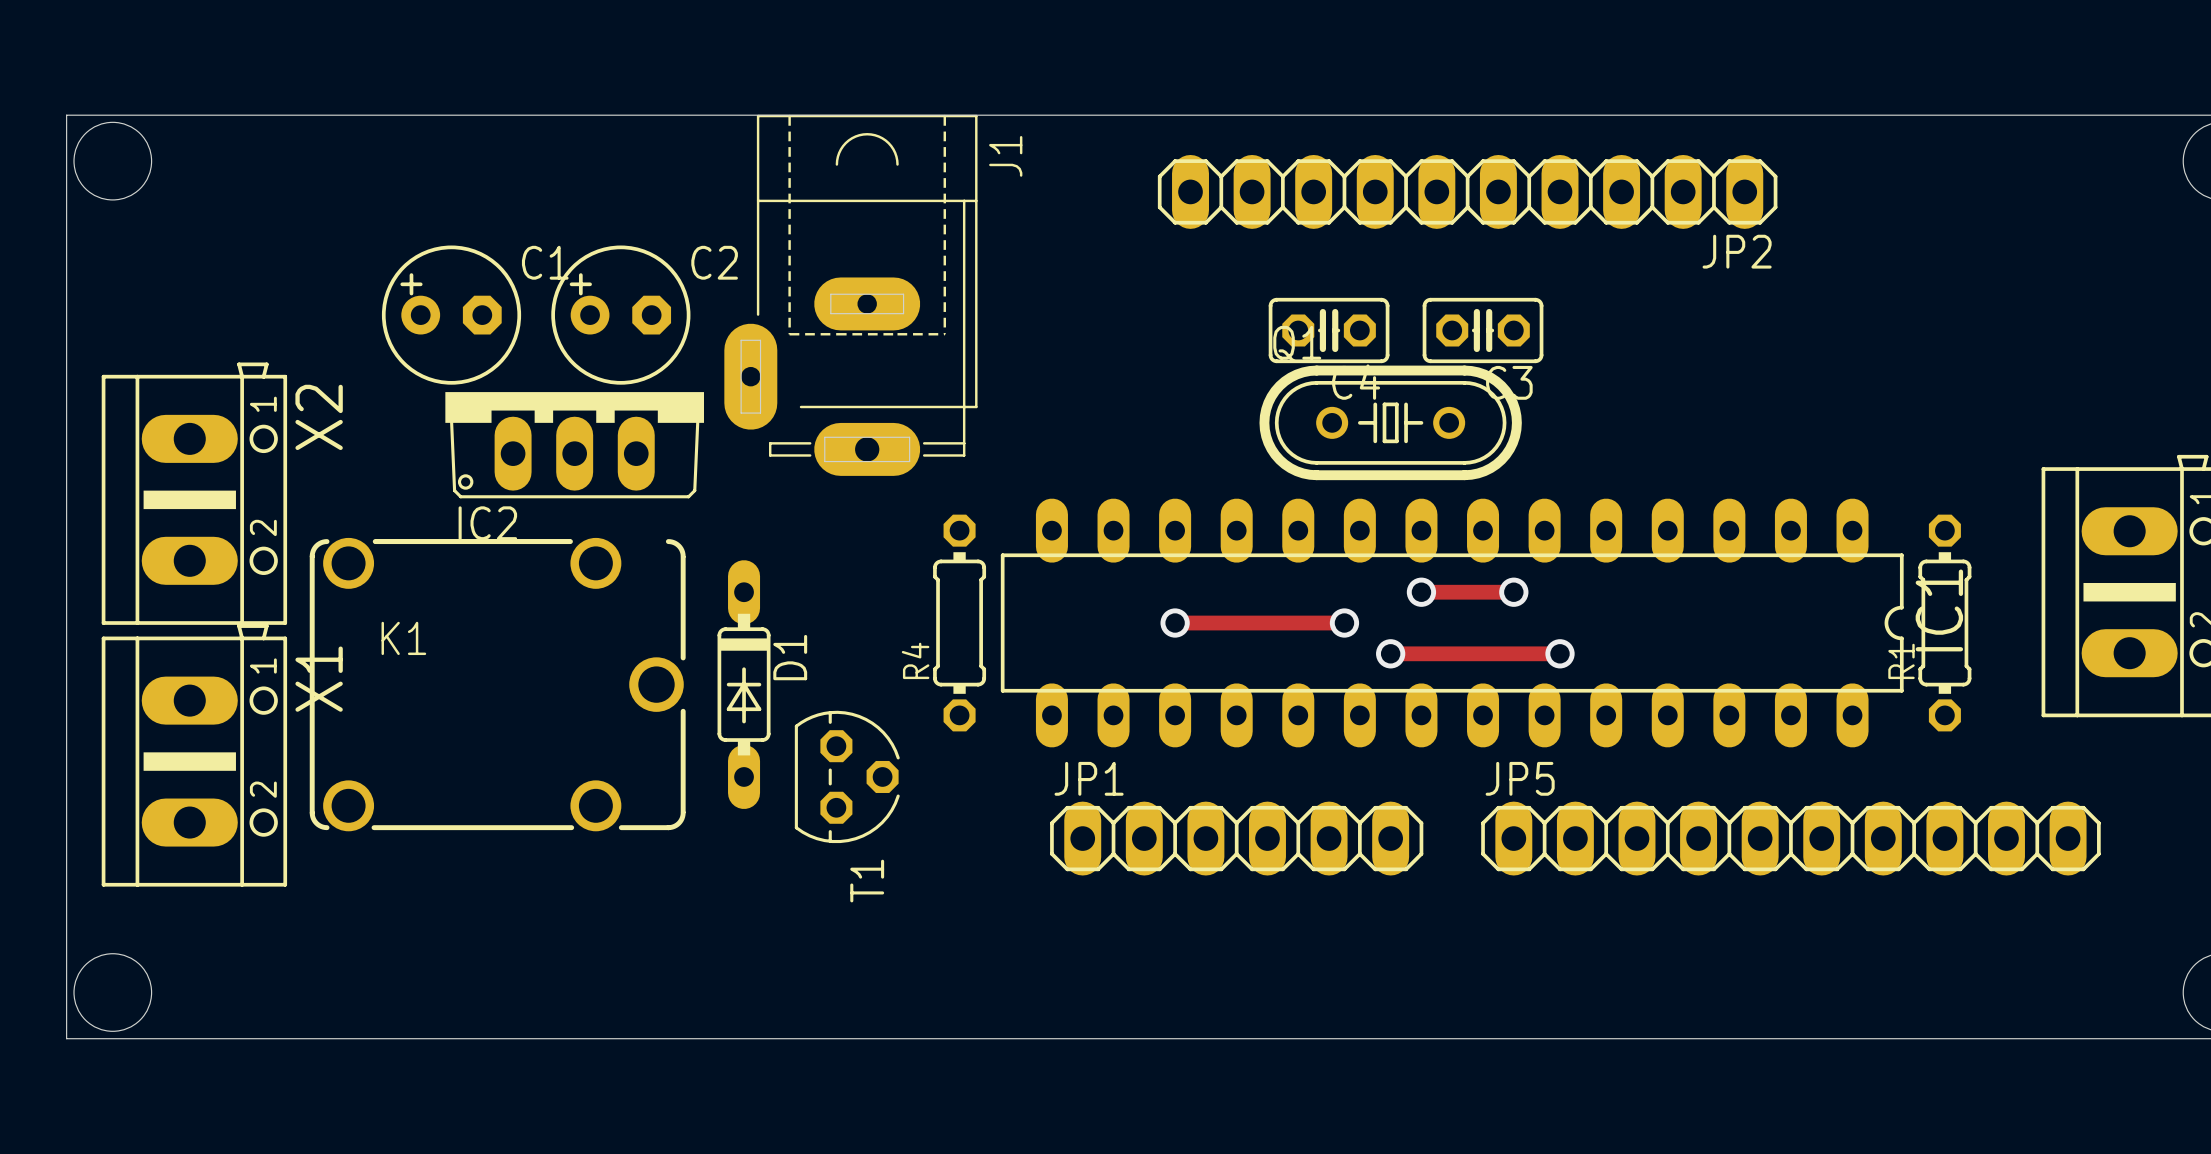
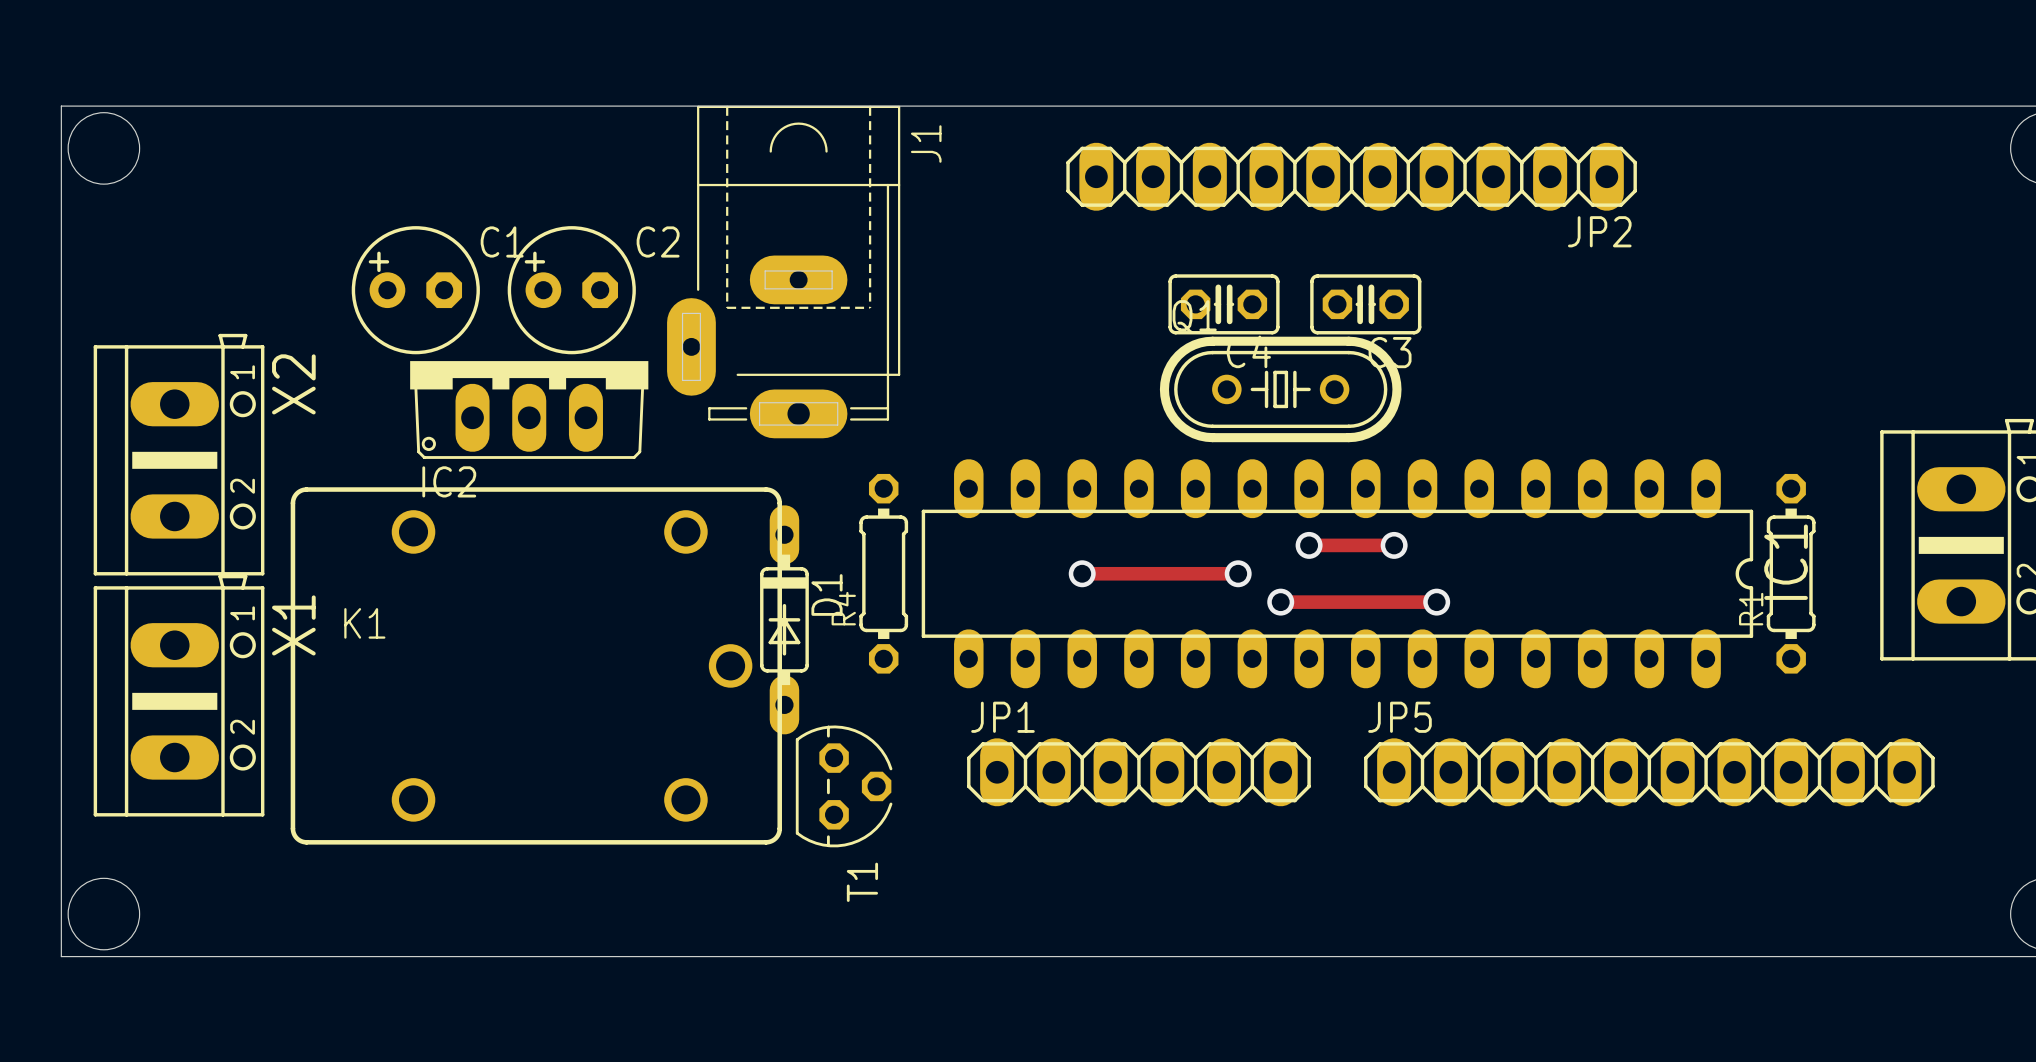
K1 footprint: [309, 537, 686, 832] -> [290, 487, 782, 845]
K1 name position: K1 (403, 638) -> K1 (364, 623)
D1 position: (744, 684) -> (784, 619)
T1 footprint: [794, 710, 900, 844] -> [795, 725, 893, 848]

